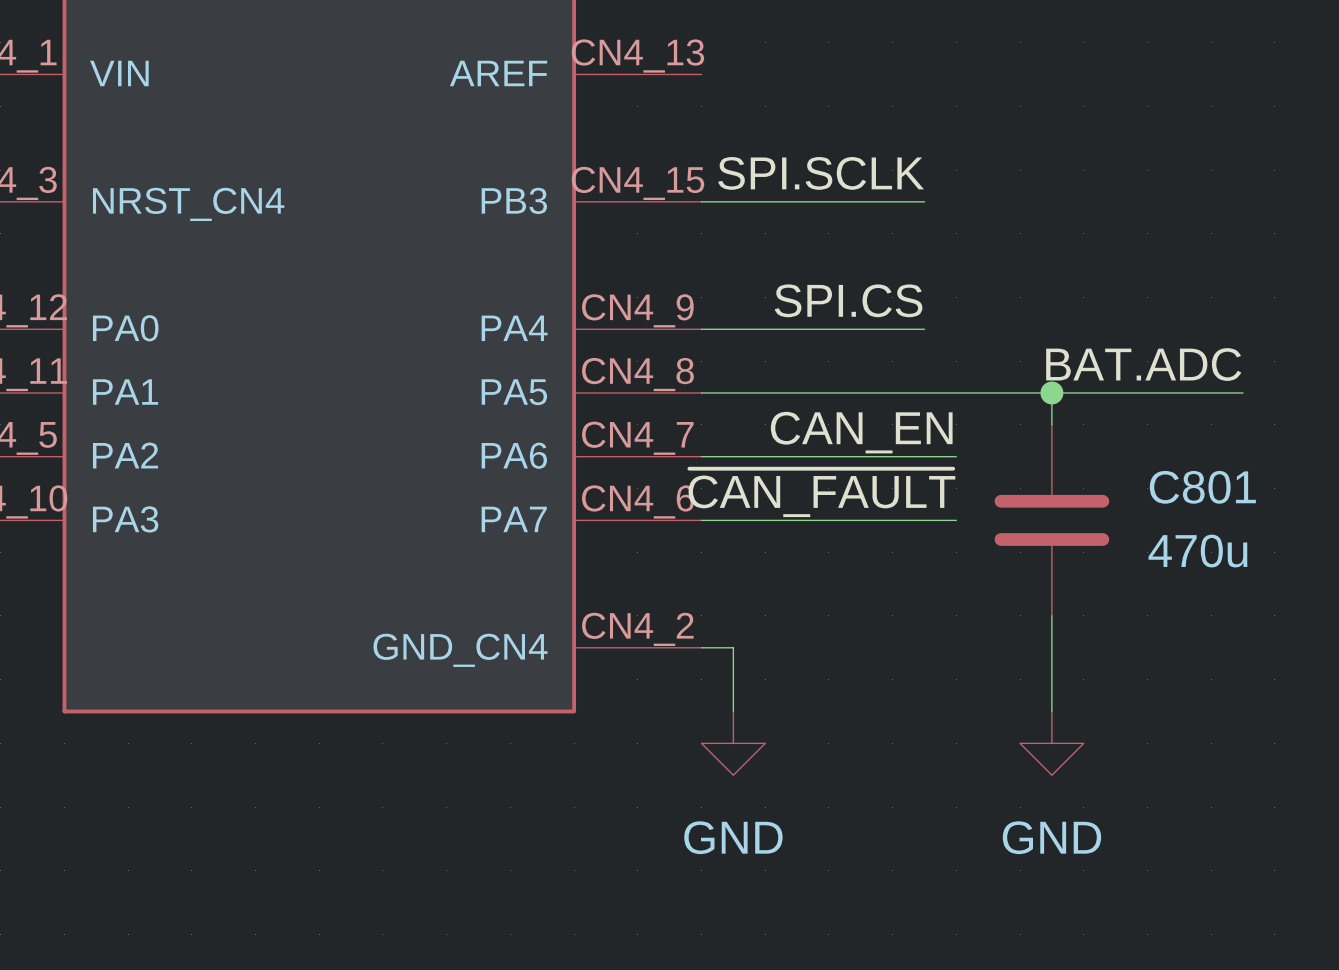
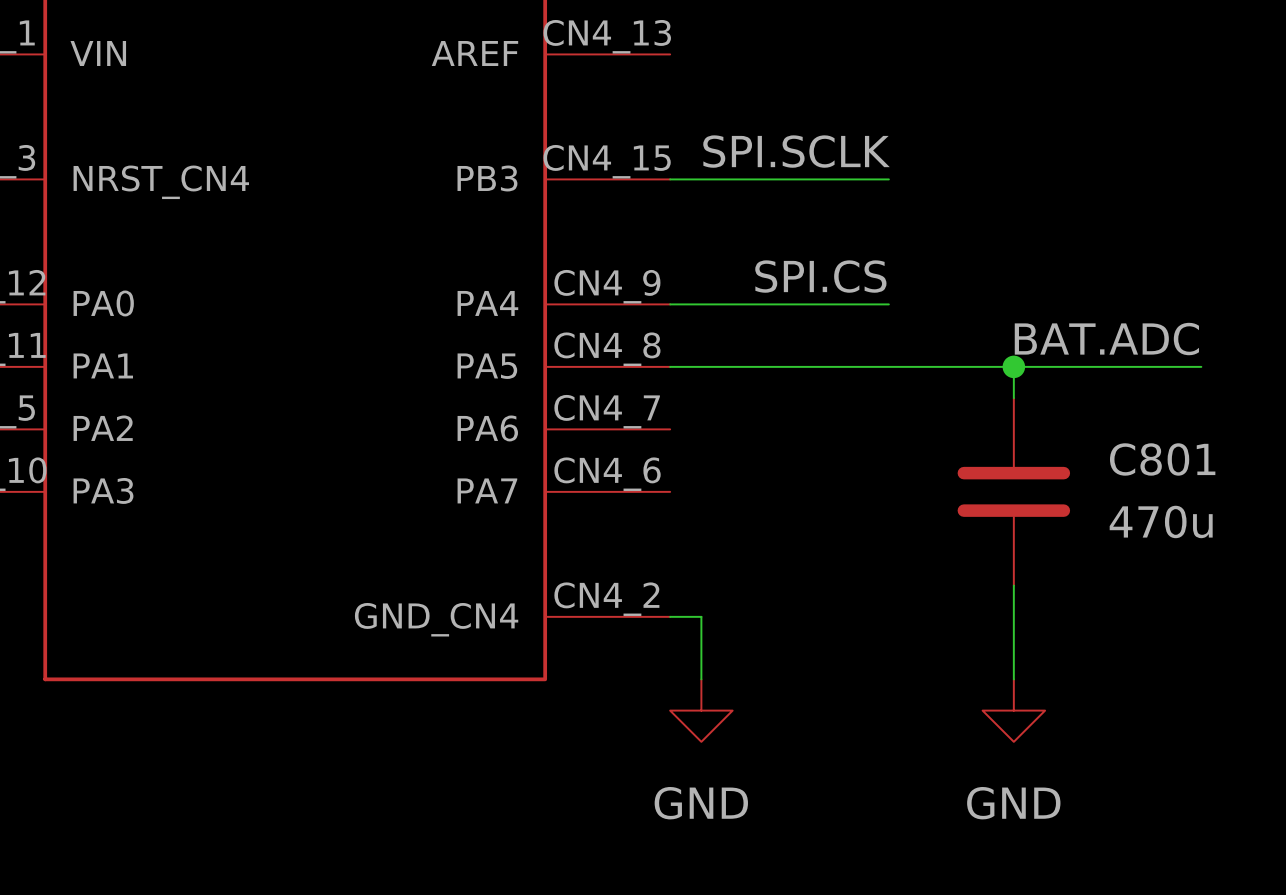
label: CAN_EN (861, 432) -> none
wire: (701, 456) (956, 456) -> none
label: ~{CAN_FAULT} (821, 492) -> none
wire: (701, 520) (956, 520) -> none

